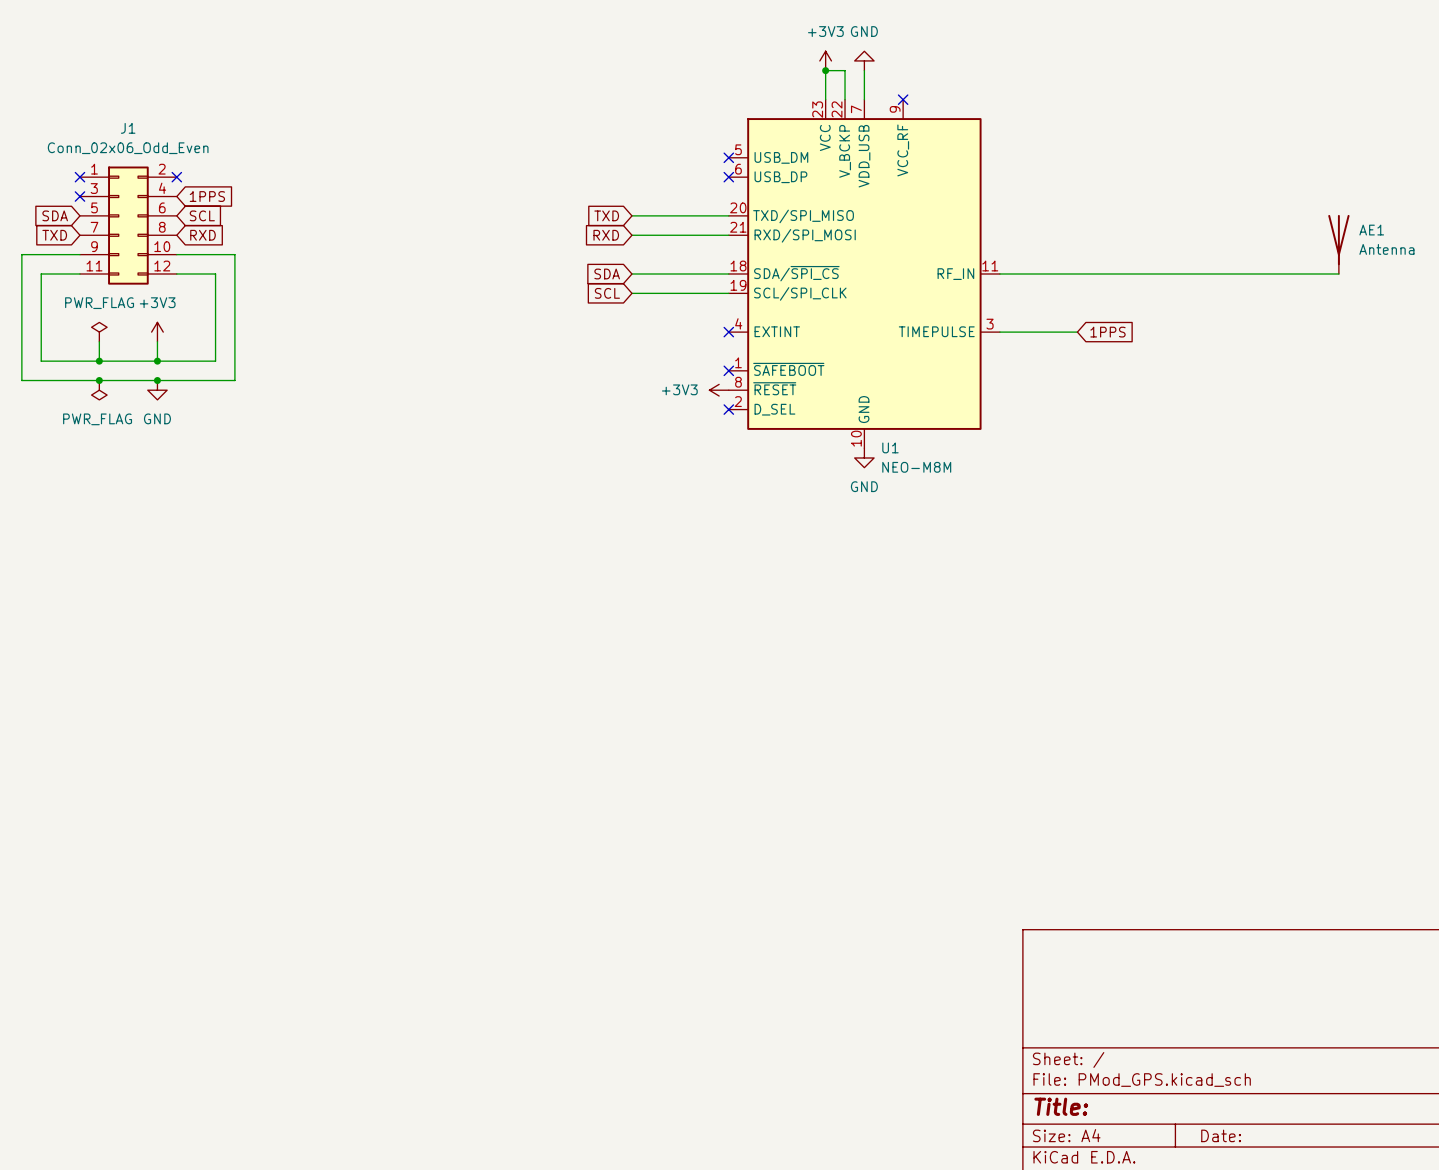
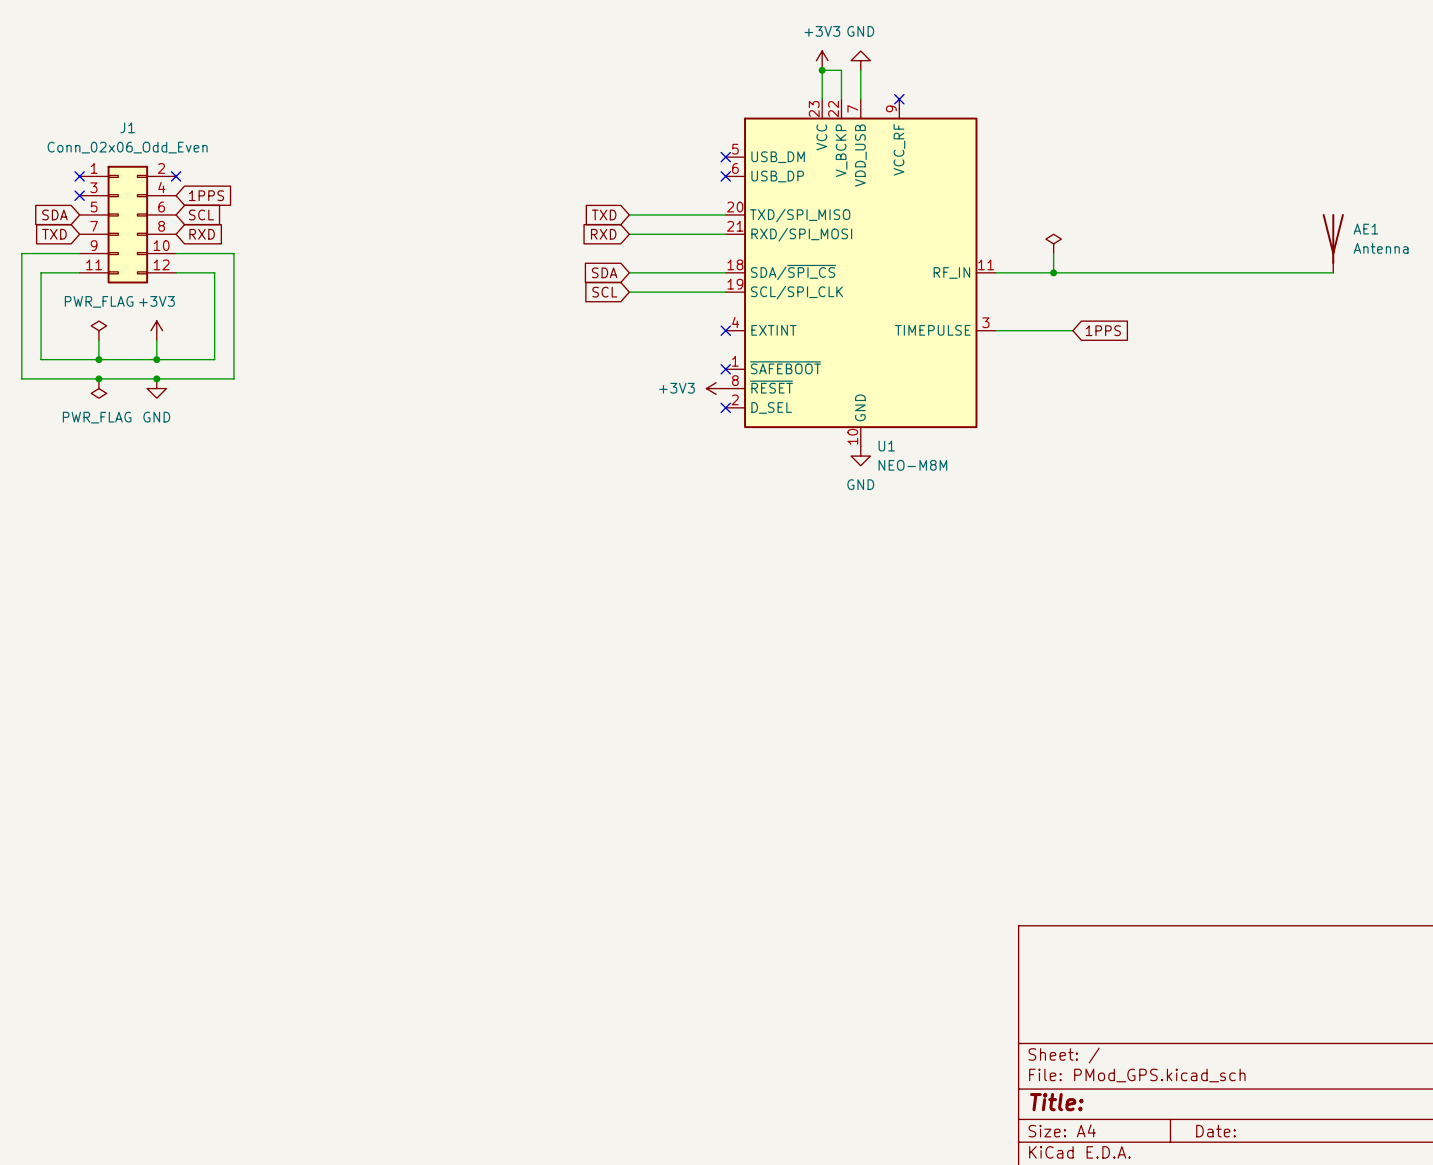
power symbol: none -> (1053, 243)
wire: none -> (1053, 253) (1053, 272)
junction: none -> (1053, 272)

